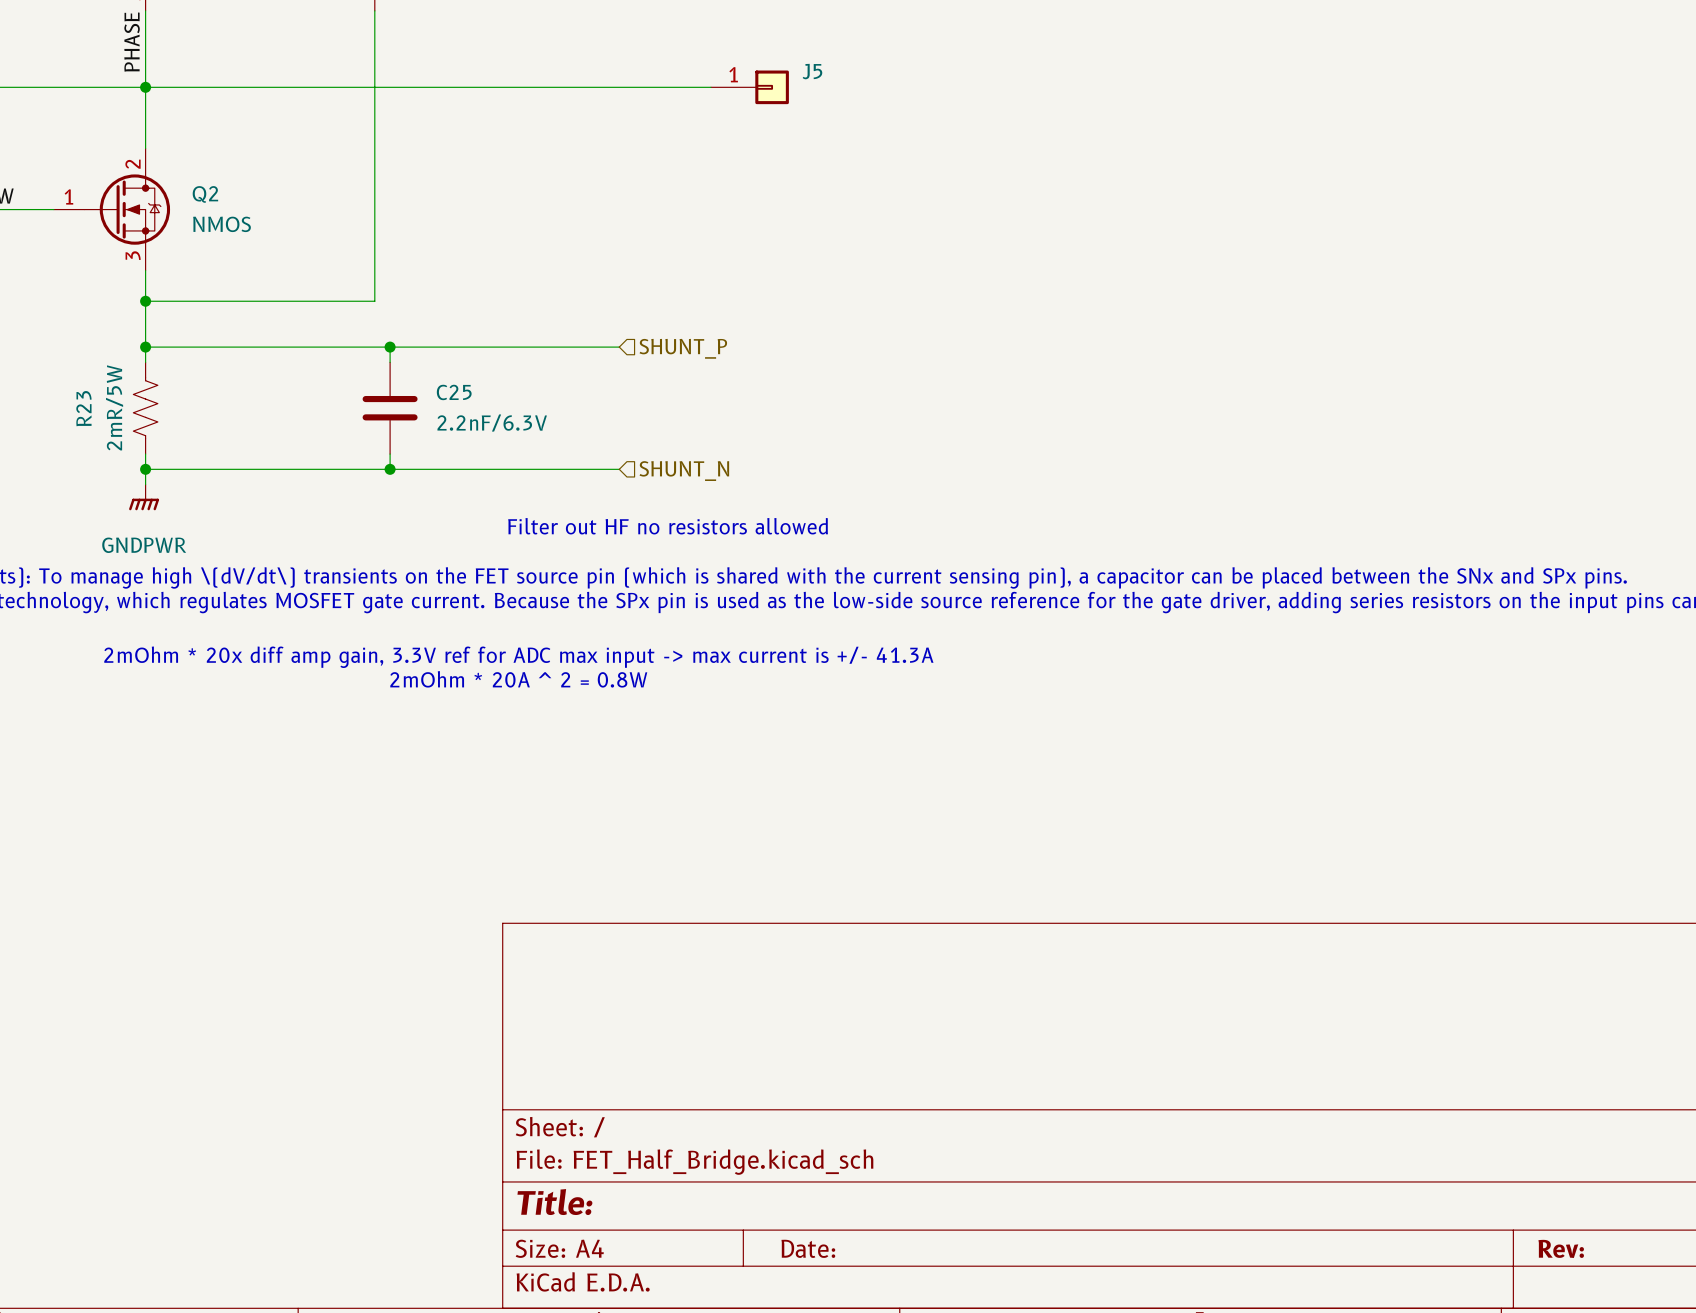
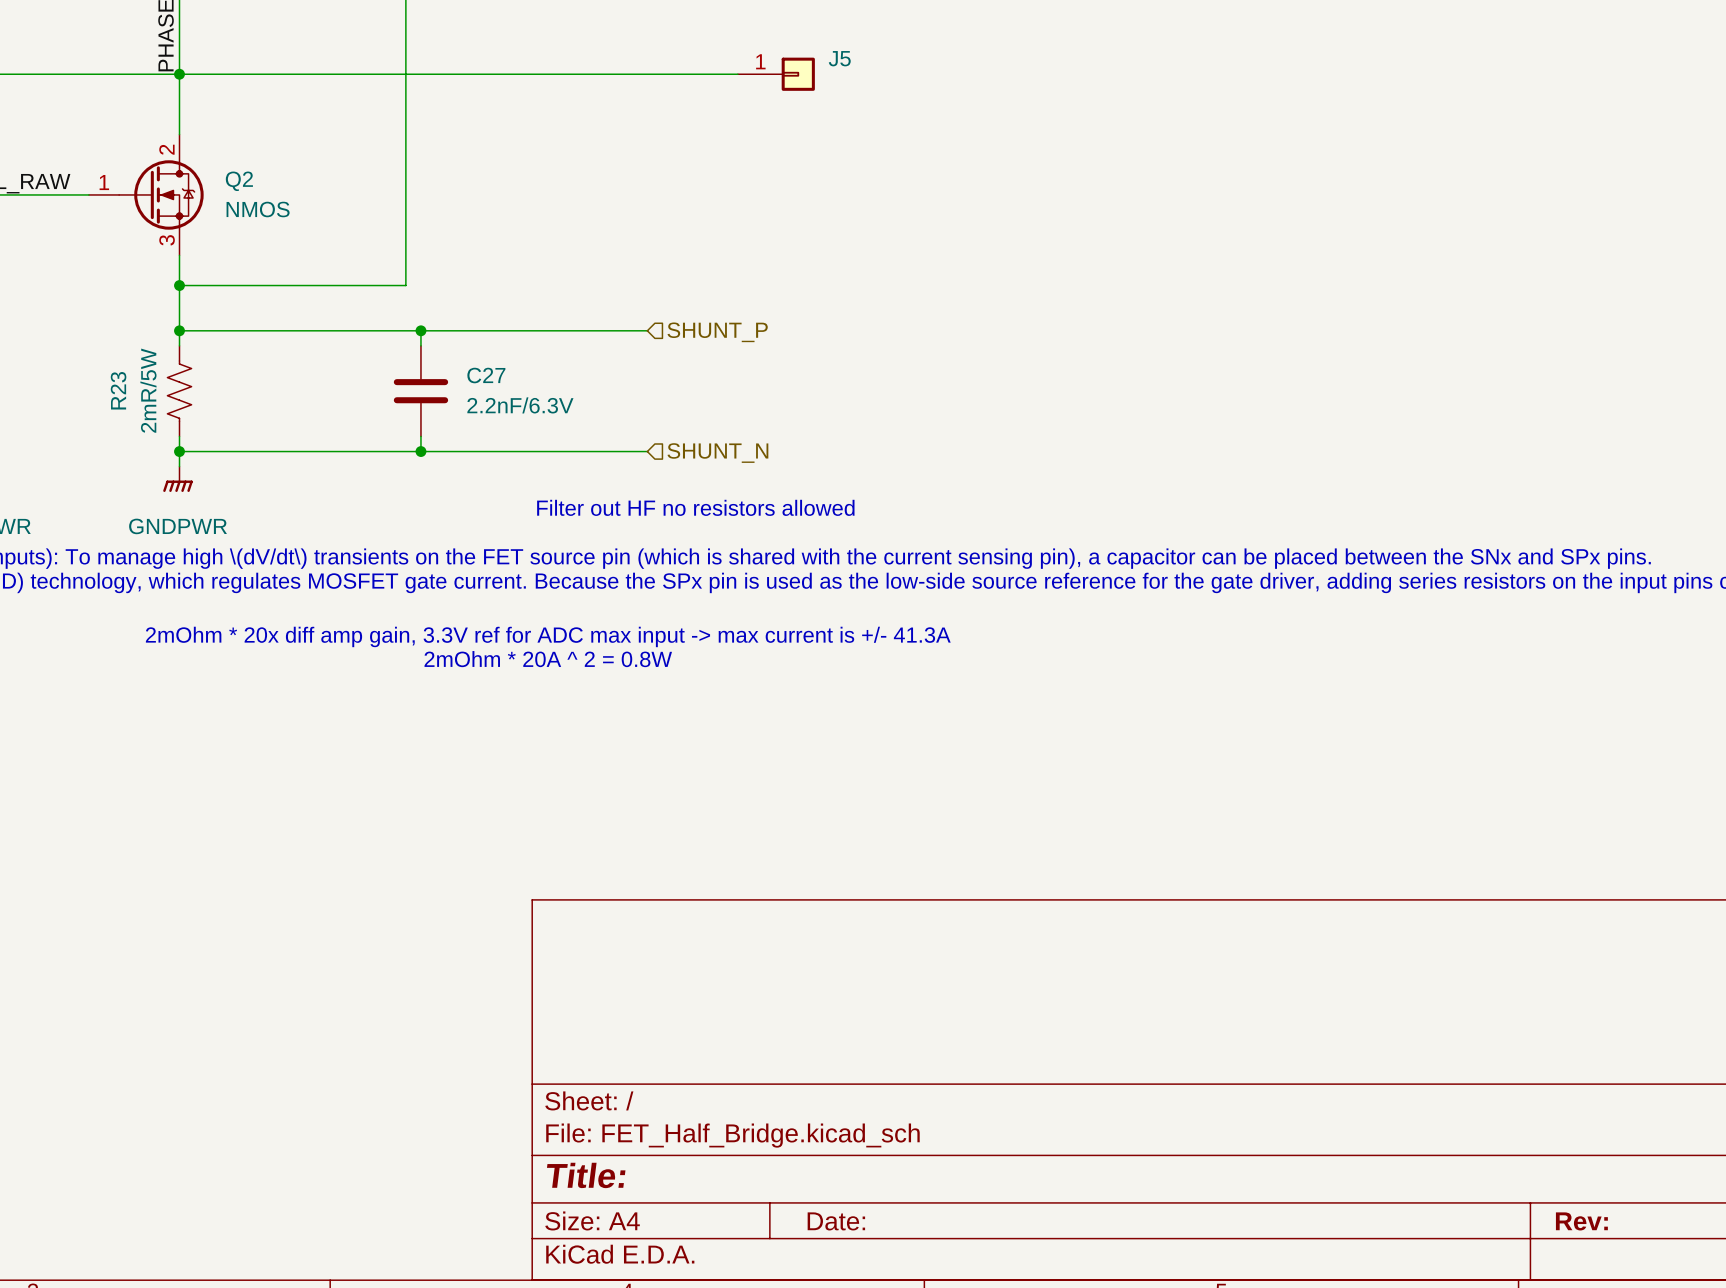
C25 name: C25 (454, 392) -> C27 (486, 375)

